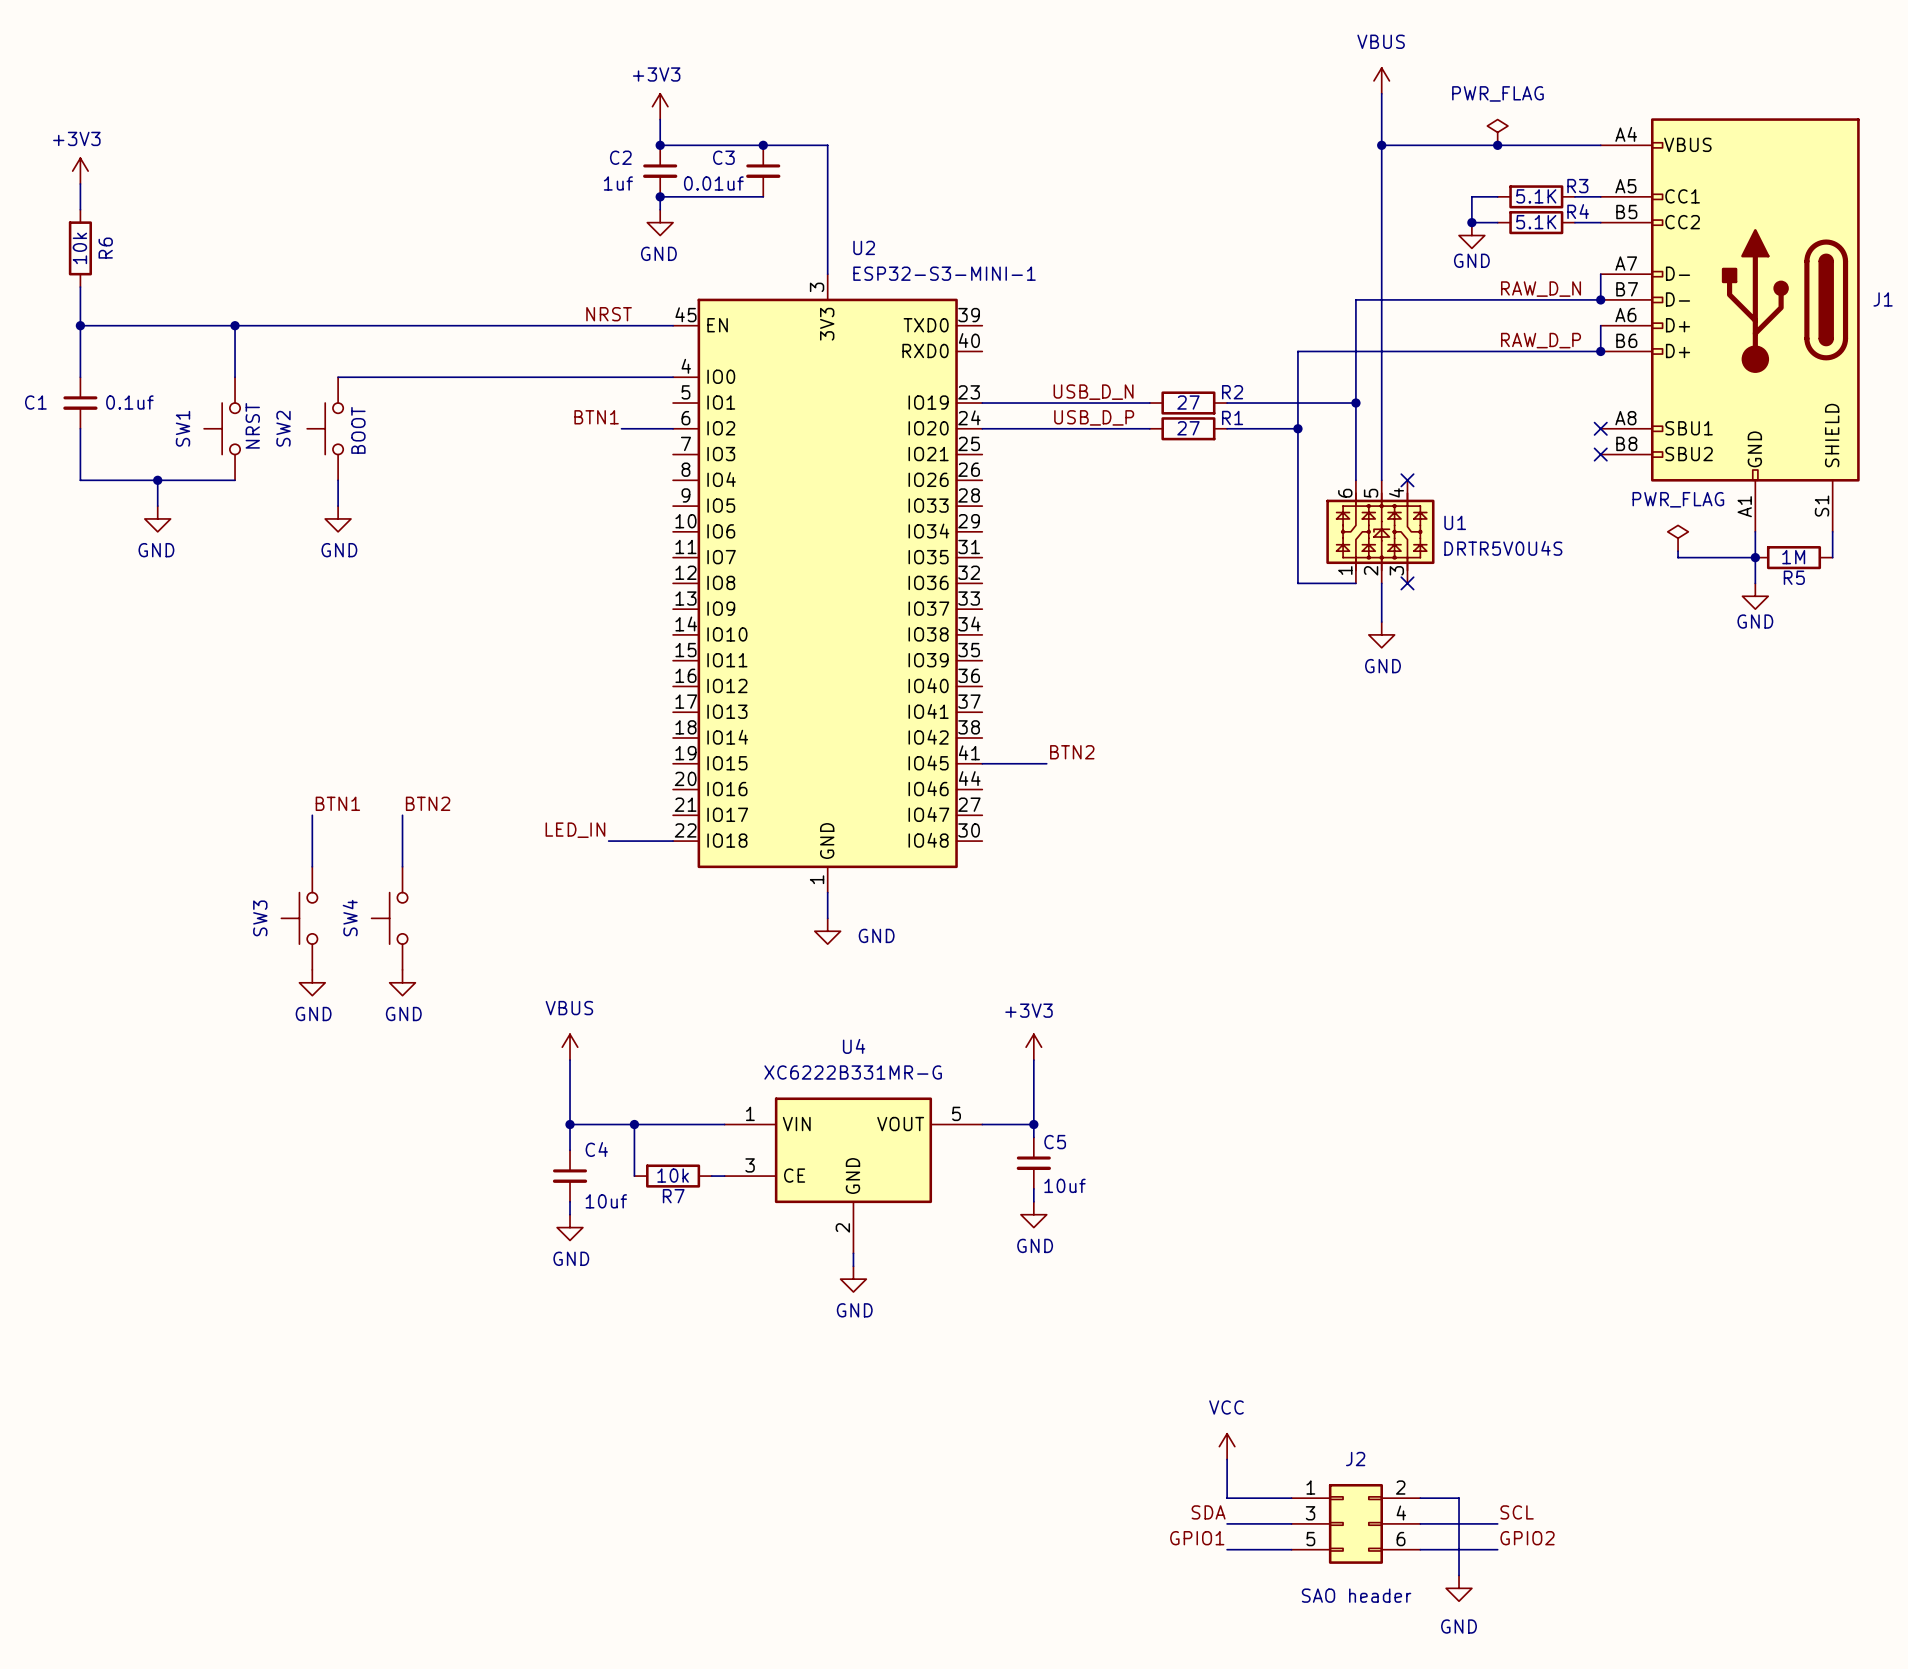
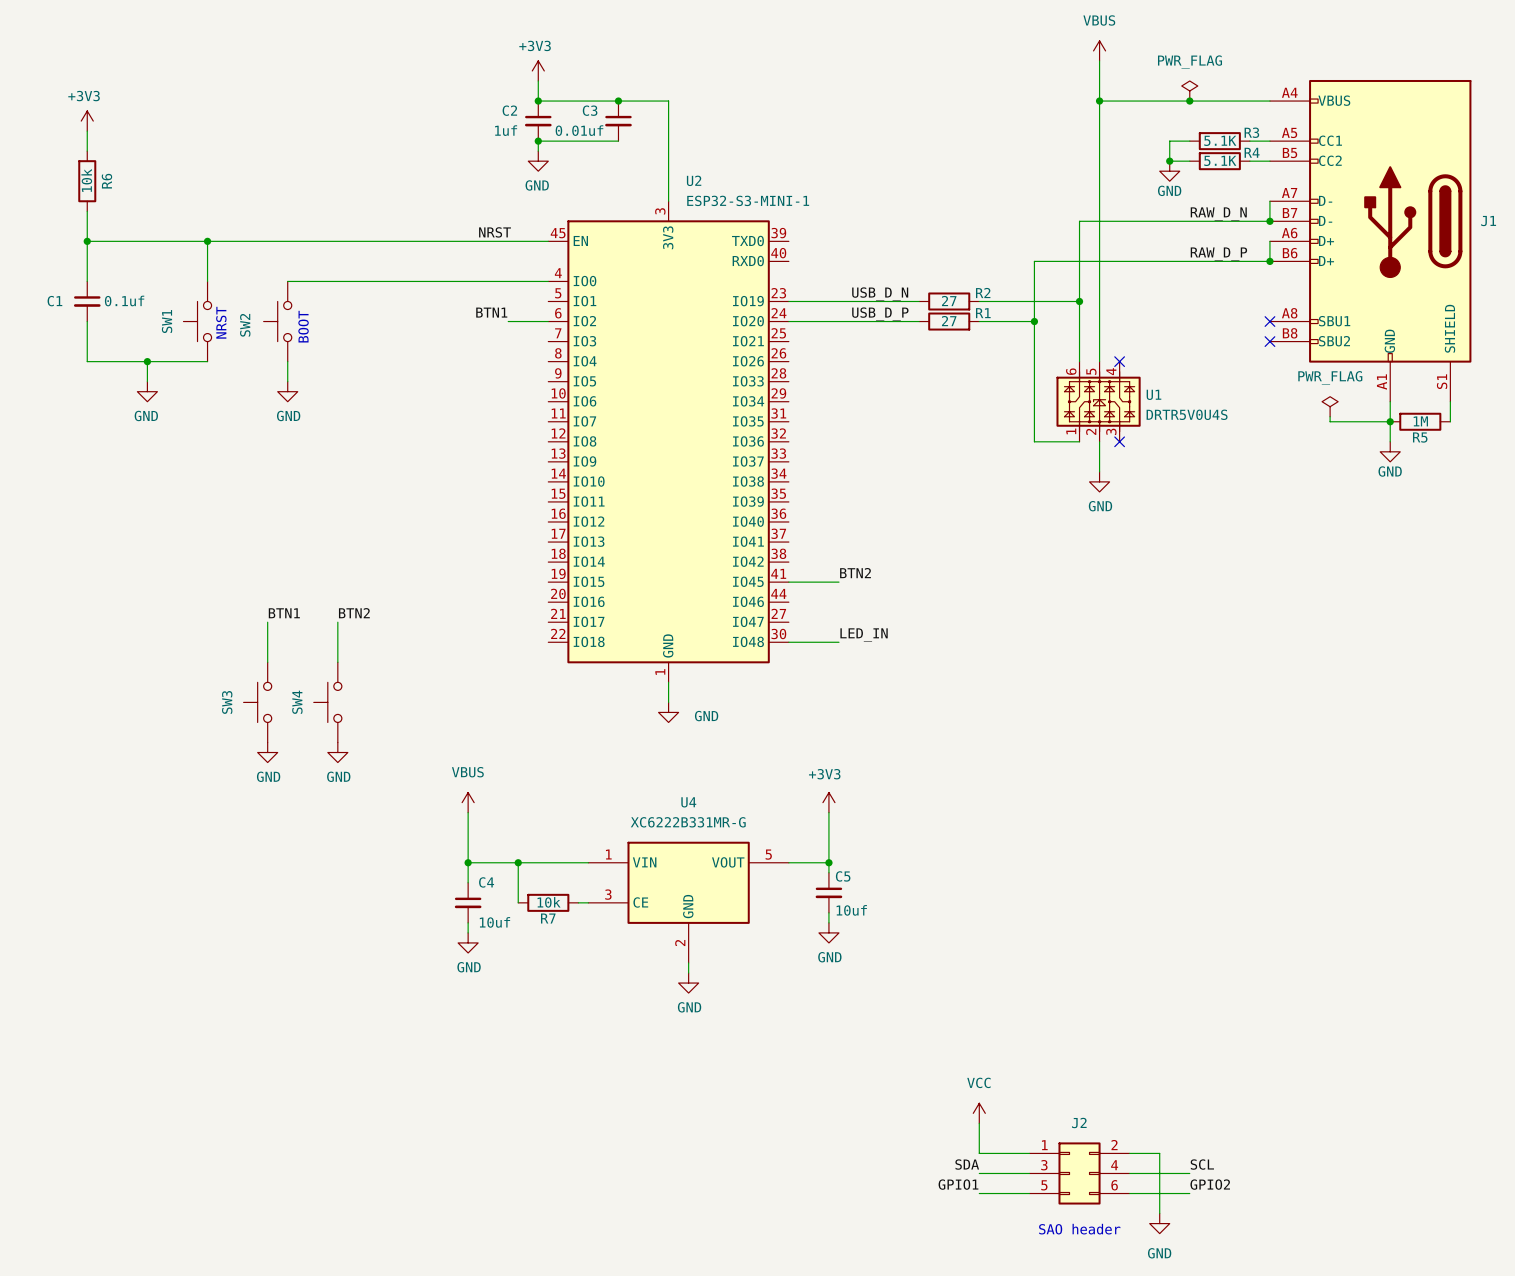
label: LED_IN (575, 830) -> none
label: none -> LED_IN (864, 634)
wire: (608, 841) (673, 841) -> none
wire: none -> (788, 642) (838, 642)

